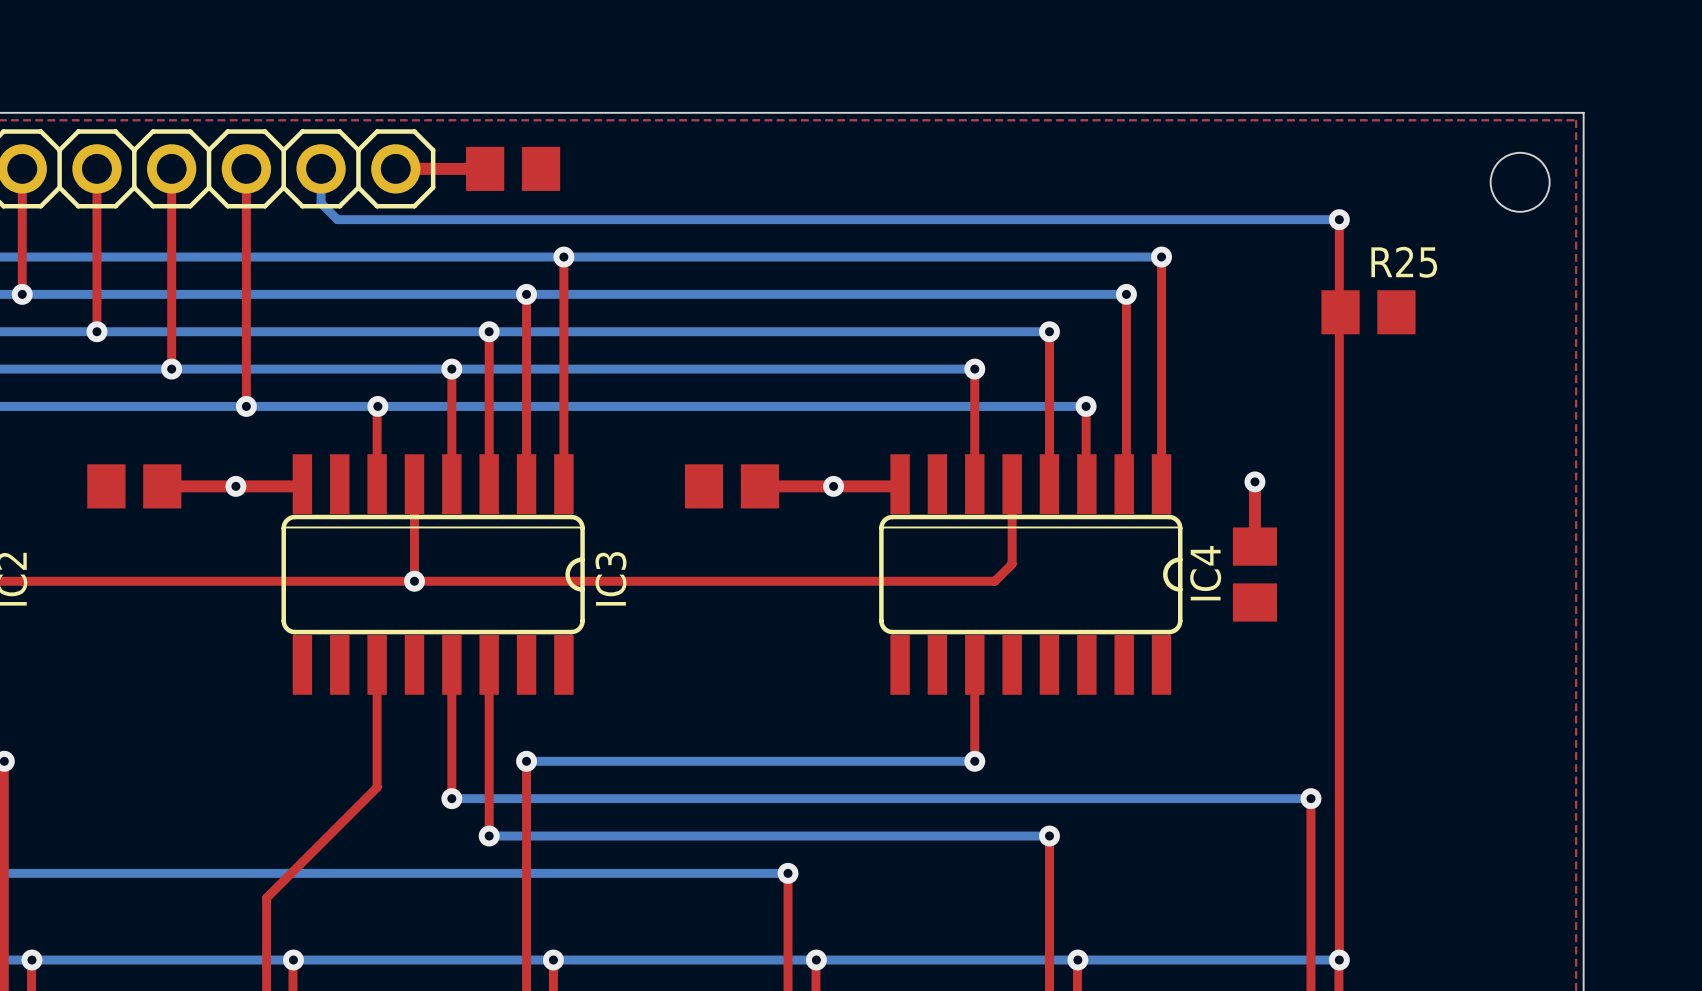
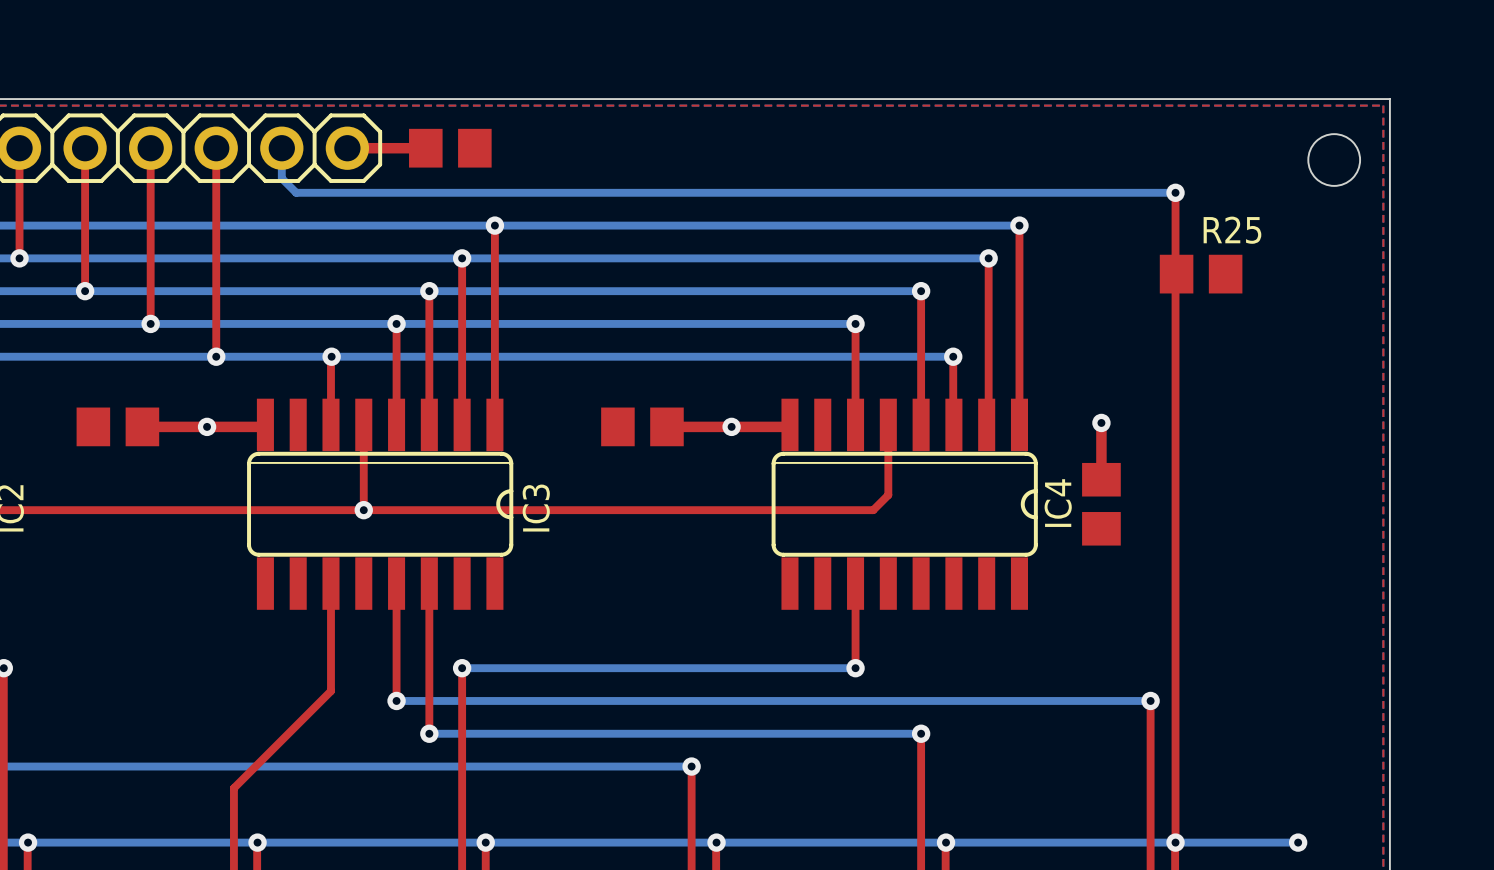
bottom track: none -> (1175, 842) (1298, 842)
via: none -> (1298, 842)

